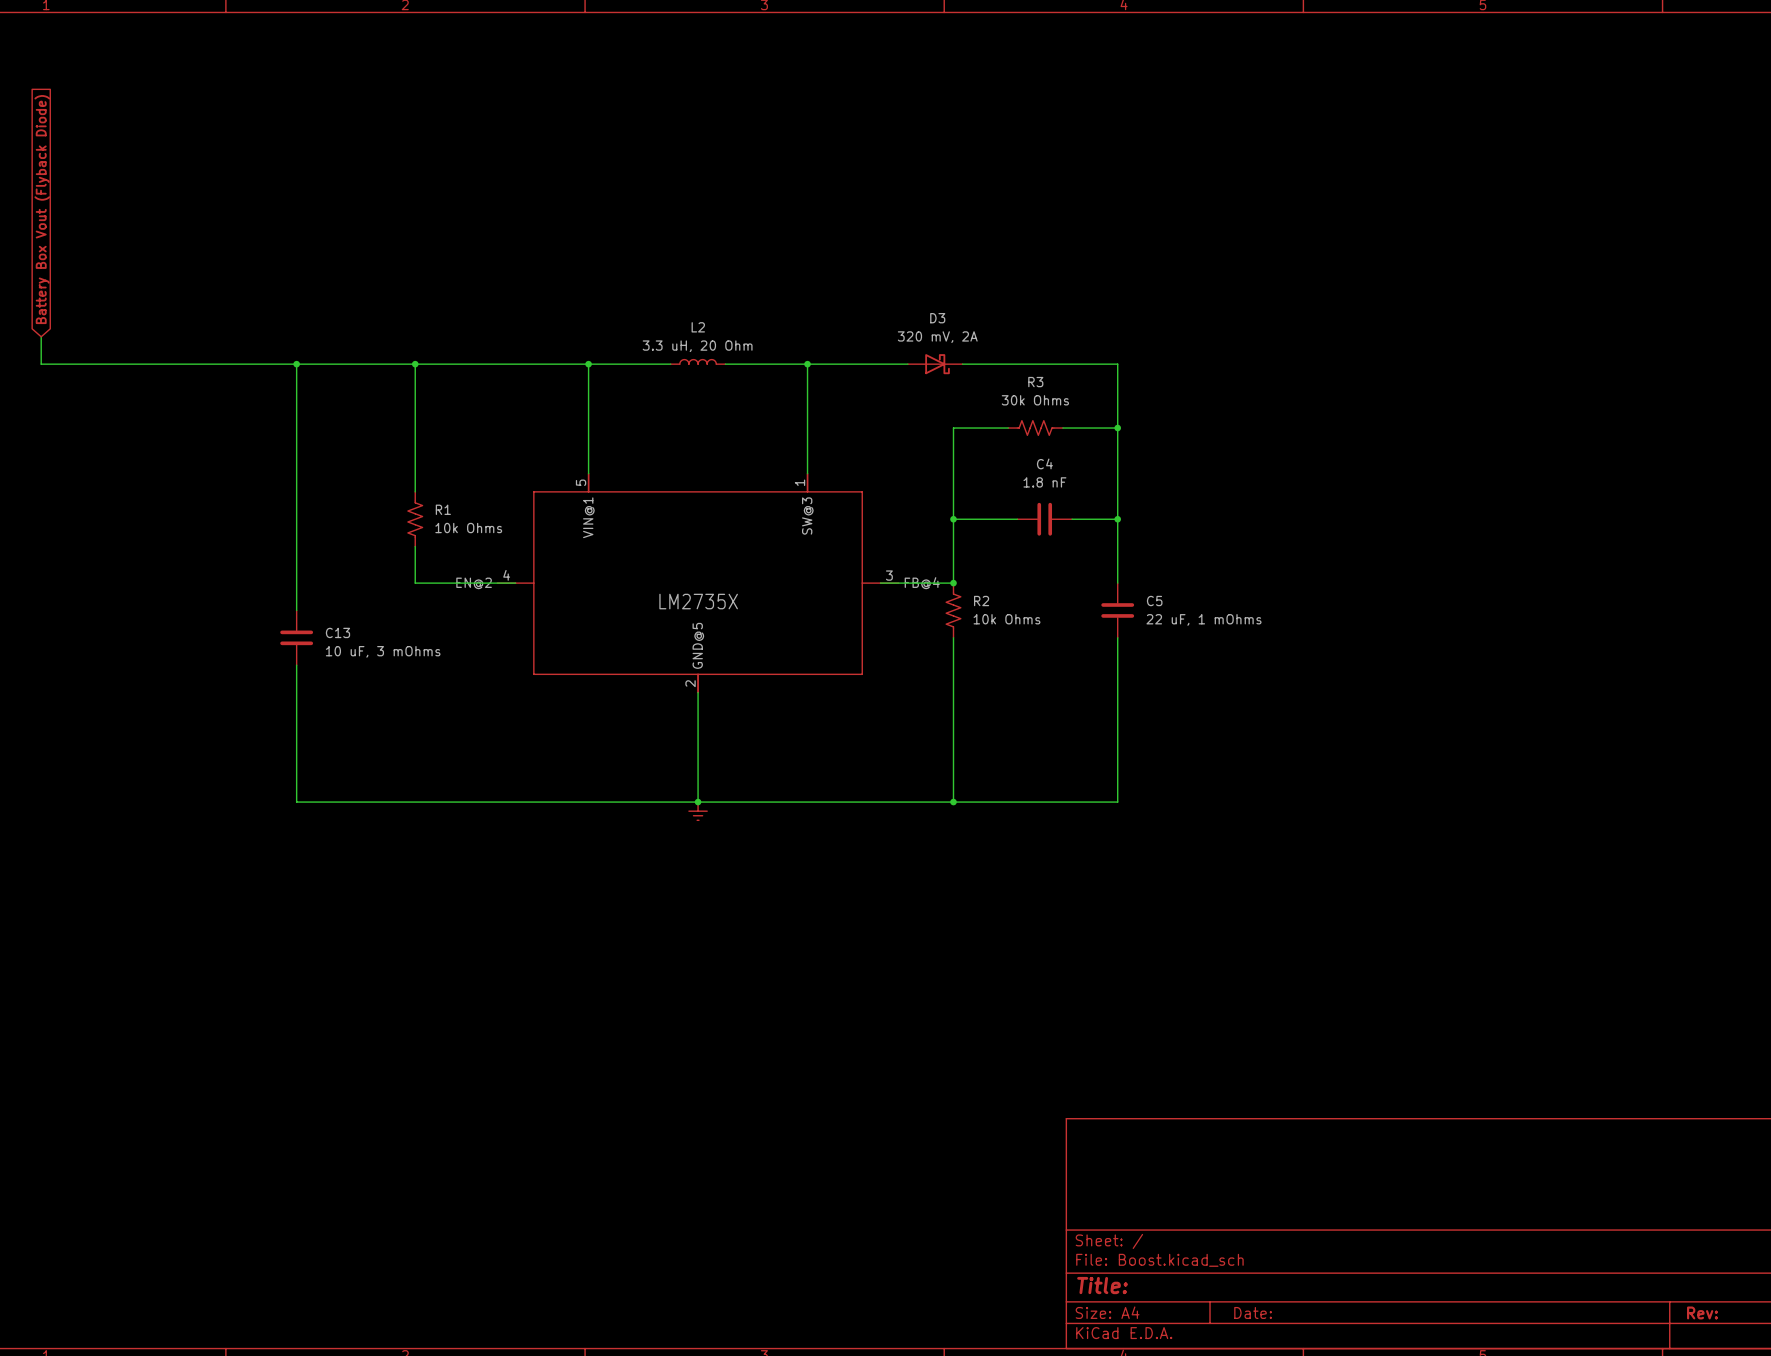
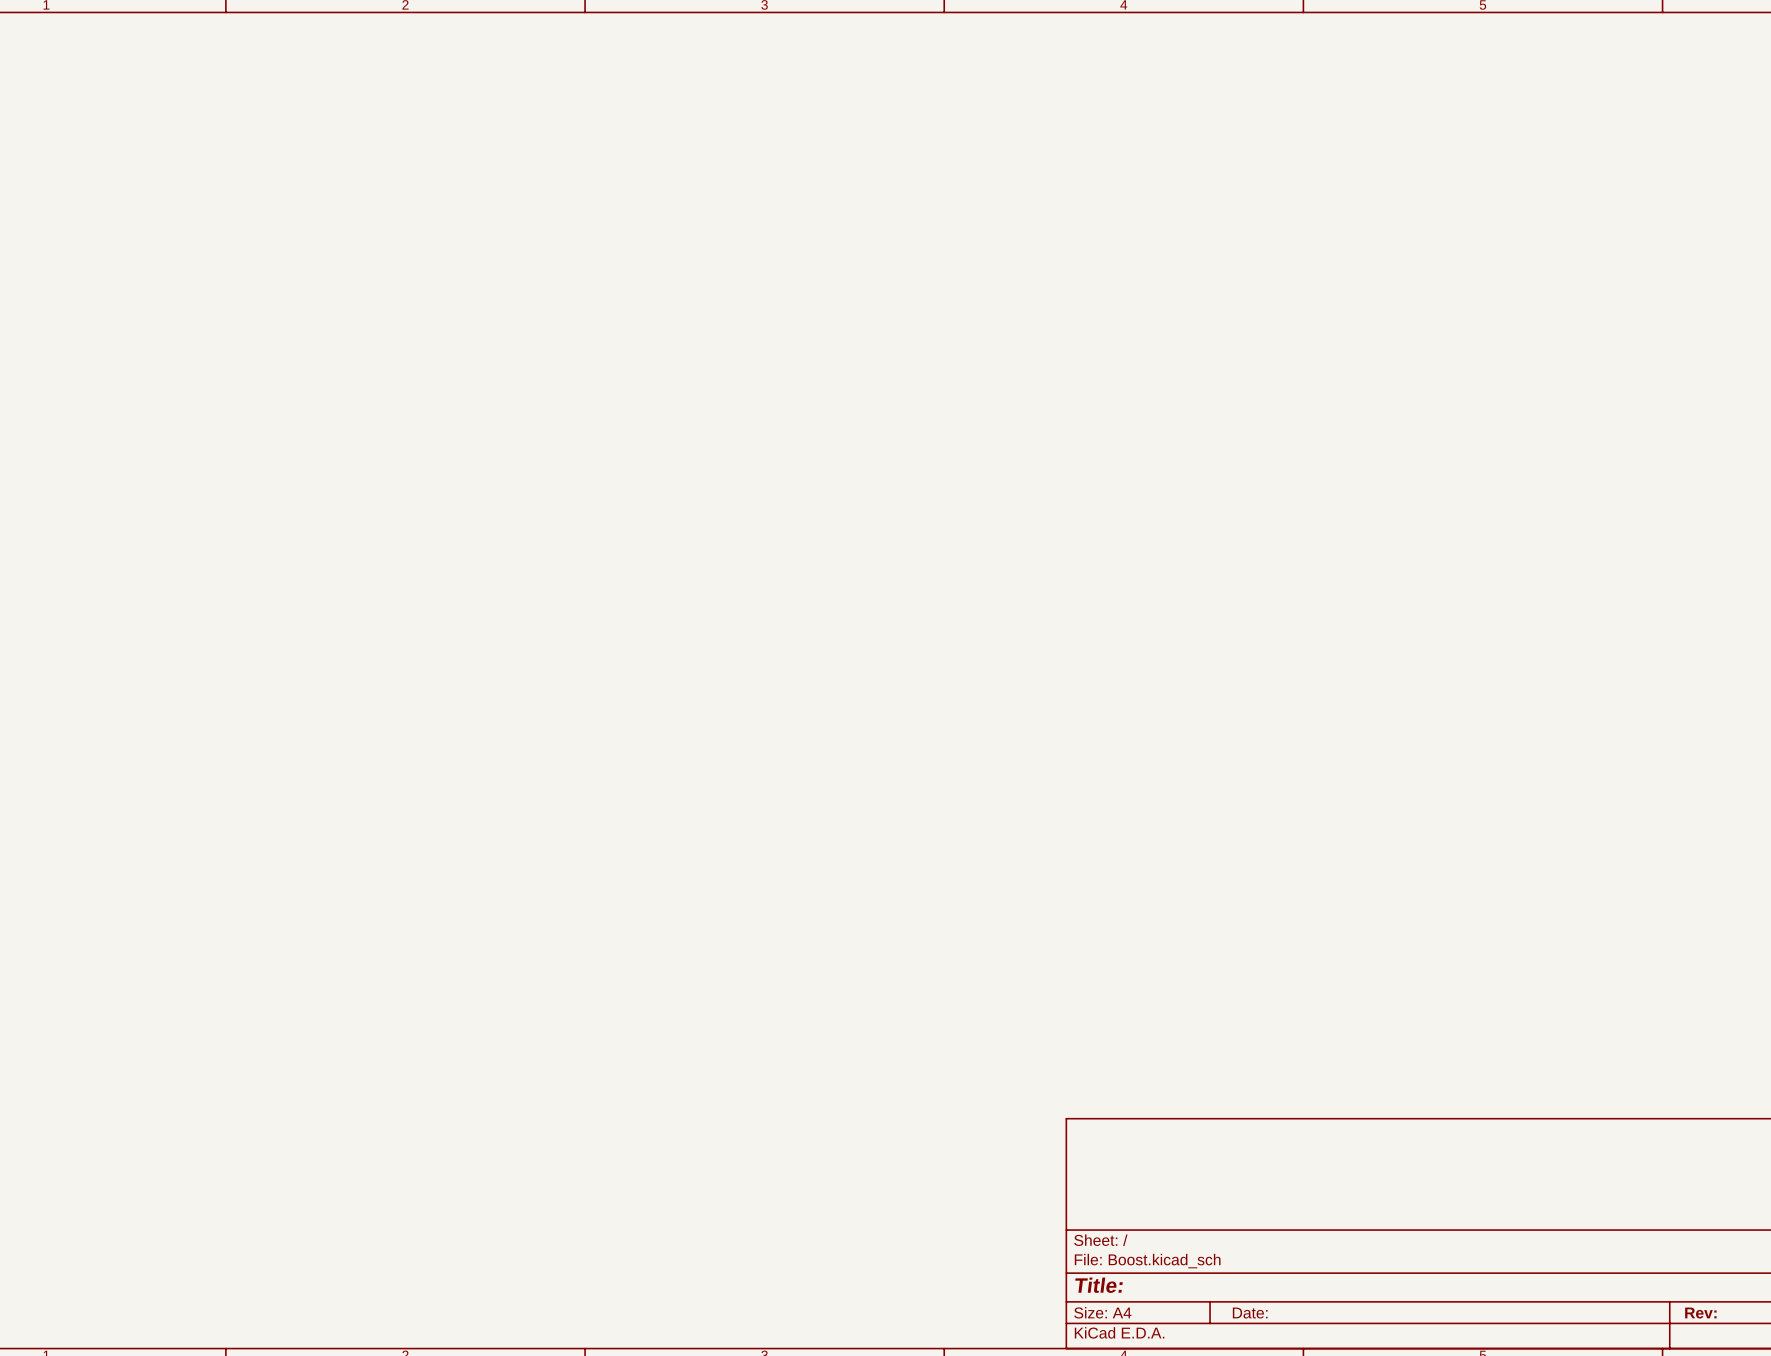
global label: Battery Box Vout (Flyback Diode) (42, 209) -> none
wire: (41, 336) (41, 364) (670, 364) -> none
L2: 3.3 uH, 20 Ohm (698, 361) -> none
wire: (296, 364) (296, 610) -> none
junction: (296, 364) -> none
wire: (415, 364) (415, 491) -> none
junction: (415, 364) -> none
wire: (588, 364) (588, 473) -> none
junction: (588, 364) -> none
wire: (725, 364) (907, 364) -> none
wire: (807, 364) (807, 473) -> none
junction: (807, 364) -> none
D3: 320 mV, 2A (935, 364) -> none
wire: (962, 364) (1117, 364) (1117, 583) -> none
wire: (1008, 428) (953, 428) (953, 583) (880, 583) -> none
R3: 30k Ohms (1035, 428) -> none
wire: (1062, 428) (1117, 428) -> none
junction: (1117, 428) -> none
R1: 10k Ohms (415, 519) -> none
wire: (953, 519) (1017, 519) -> none
junction: (953, 519) -> none
C4: 1.8 nF (1044, 519) -> none
wire: (1072, 519) (1117, 519) -> none
junction: (1117, 519) -> none
wire: (415, 546) (415, 583) (515, 583) -> none
part: LM2735X (698, 583) -> none
junction: (953, 583) -> none
R2: 10k Ohms (953, 610) -> none
C5: 22 uF, 1 mOhms (1117, 610) -> none
C13: 10 uF, 3 mOhms (296, 637) -> none
wire: (953, 637) (953, 802) -> none
wire: (1117, 637) (1117, 802) (296, 802) (296, 665) -> none
wire: (698, 692) (698, 802) -> none
junction: (698, 802) -> none
junction: (953, 802) -> none
power symbol: (698, 811) -> none

